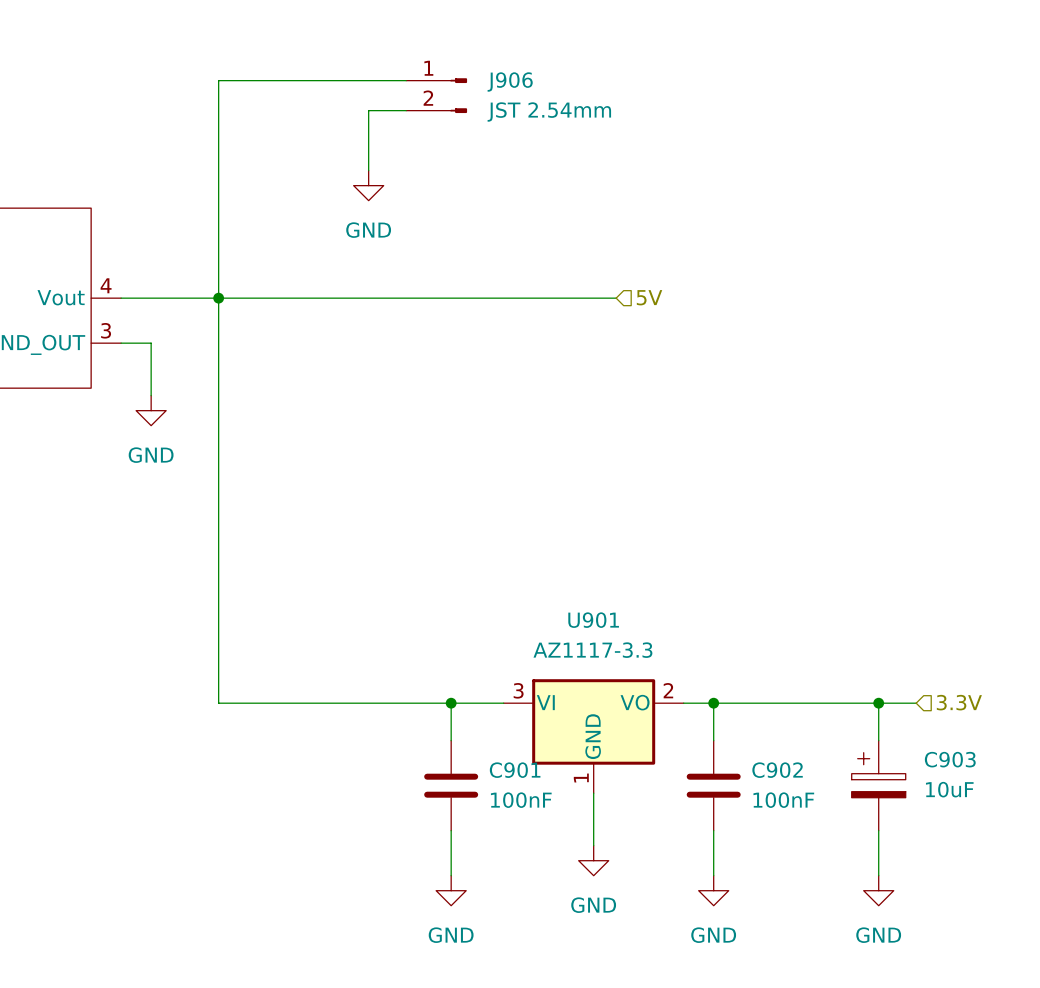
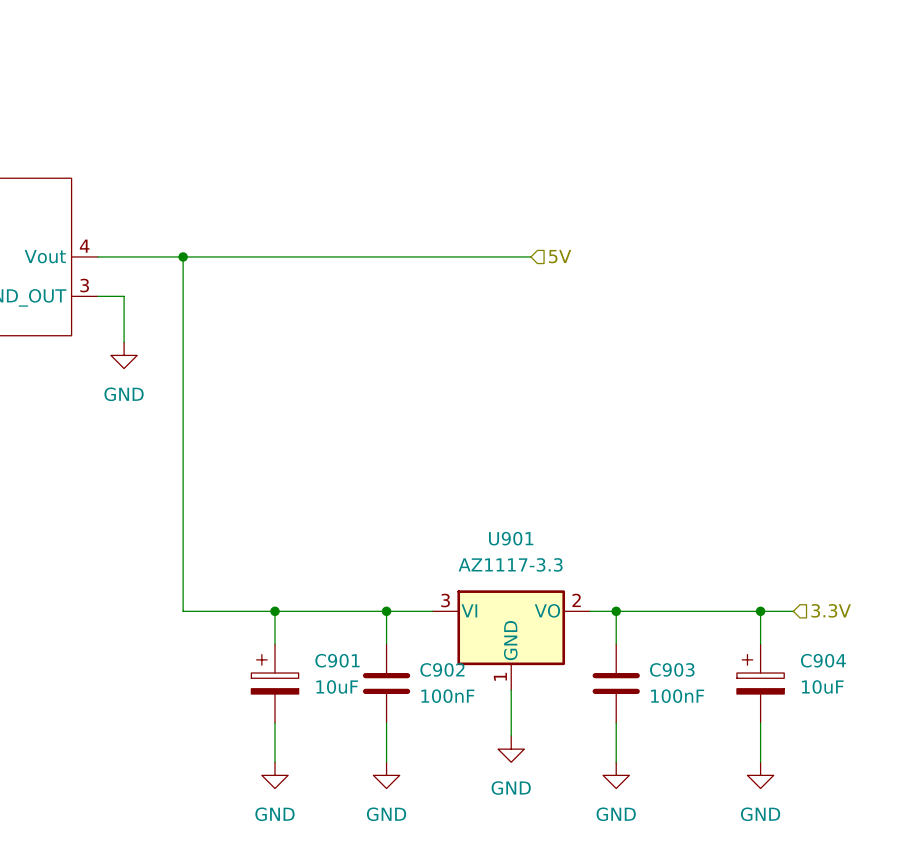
wire: (406, 80) (218, 80) (218, 298) -> none
J906: JST 2.54mm (436, 95) -> none
wire: (406, 110) (368, 110) (368, 170) -> none
power symbol: GND (368, 185) -> none
wire: none -> (275, 611) (275, 644)
junction: none -> (275, 611)
C903 name: C903 (950, 759) -> C904 (823, 660)
C901 name: C901 (515, 770) -> C902 (442, 669)
C902 name: C902 (777, 770) -> C903 (672, 669)
C901: none -> 10uF (275, 683)
wire: none -> (275, 722) (275, 762)
power symbol: none -> GND (275, 775)

